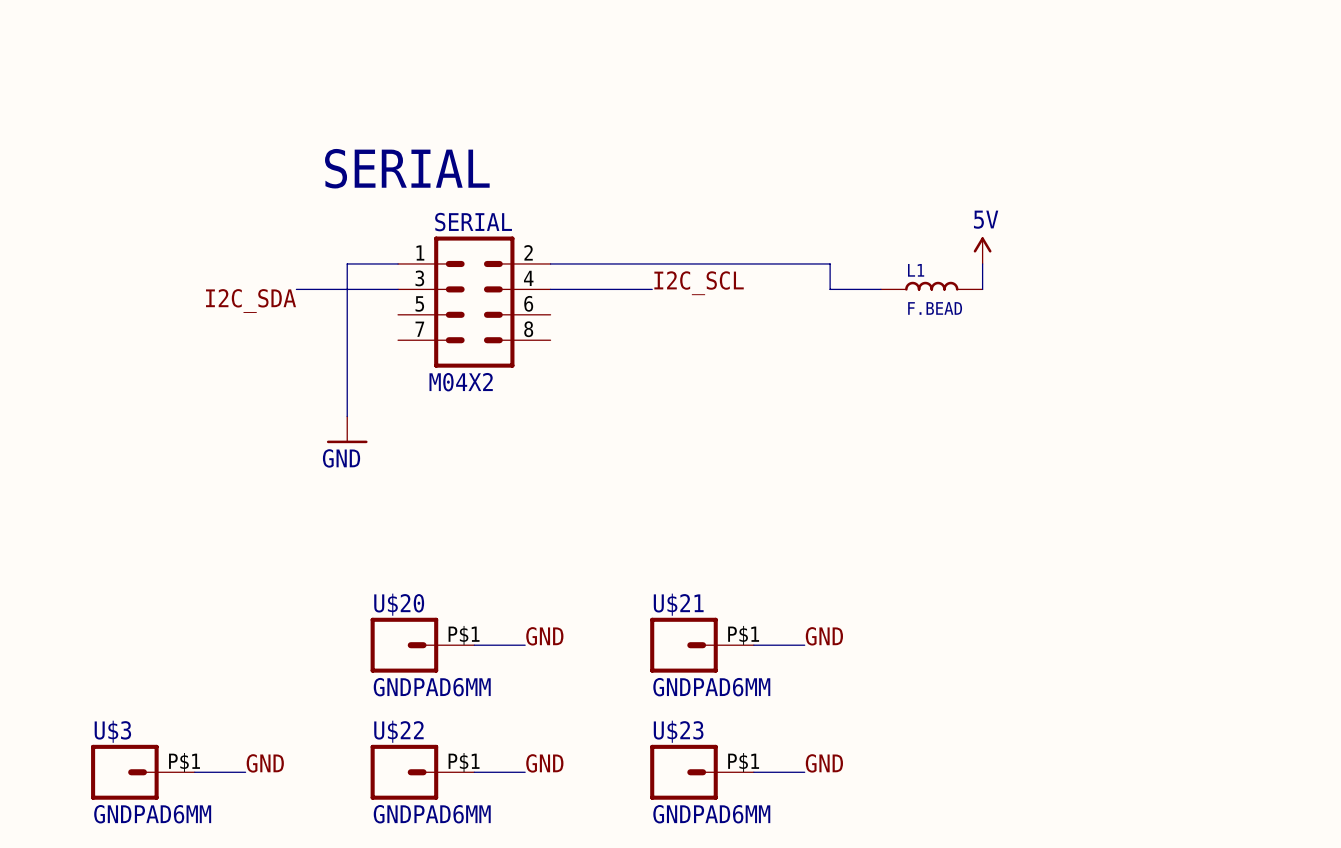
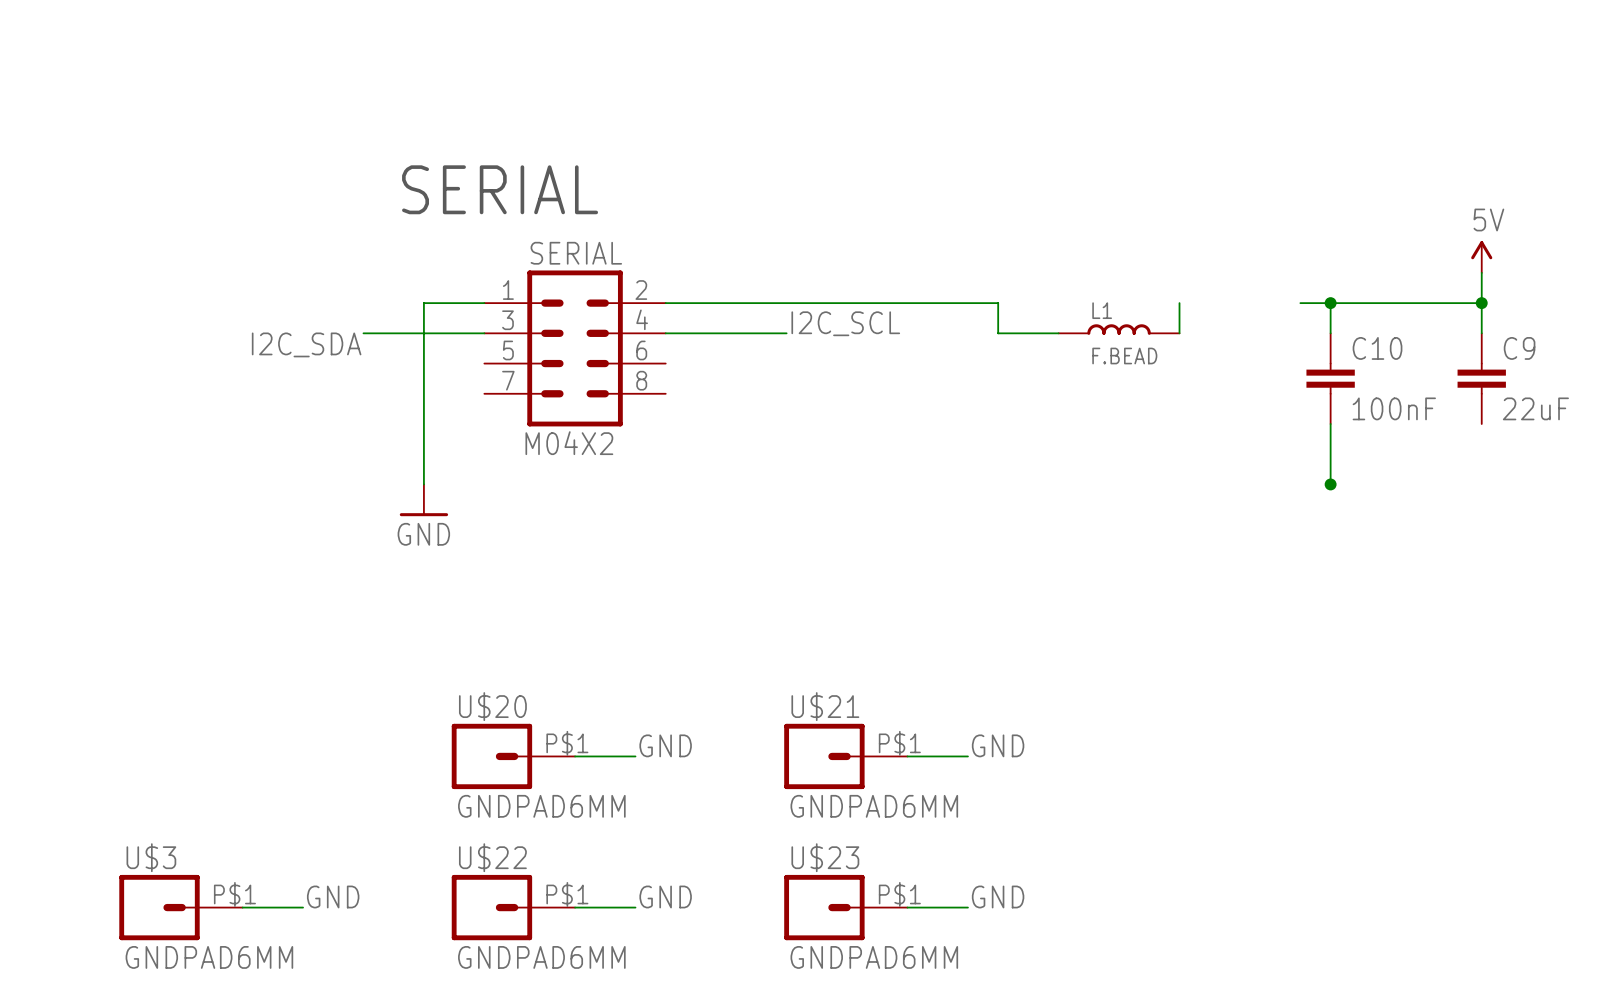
power symbol: none -> 5V (1481, 257)
wire: none -> (1481, 272) (1481, 333)
power symbol: 5V (982, 250) -> none
wire: none -> (1300, 303) (1481, 303)
wire: none -> (1330, 303) (1330, 333)
junction: none -> (1330, 303)
junction: none -> (1481, 303)
C10: none -> 100nF (1330, 378)
C9: none -> 22uF (1481, 378)
wire: none -> (1330, 424) (1330, 484)
junction: none -> (1330, 484)

